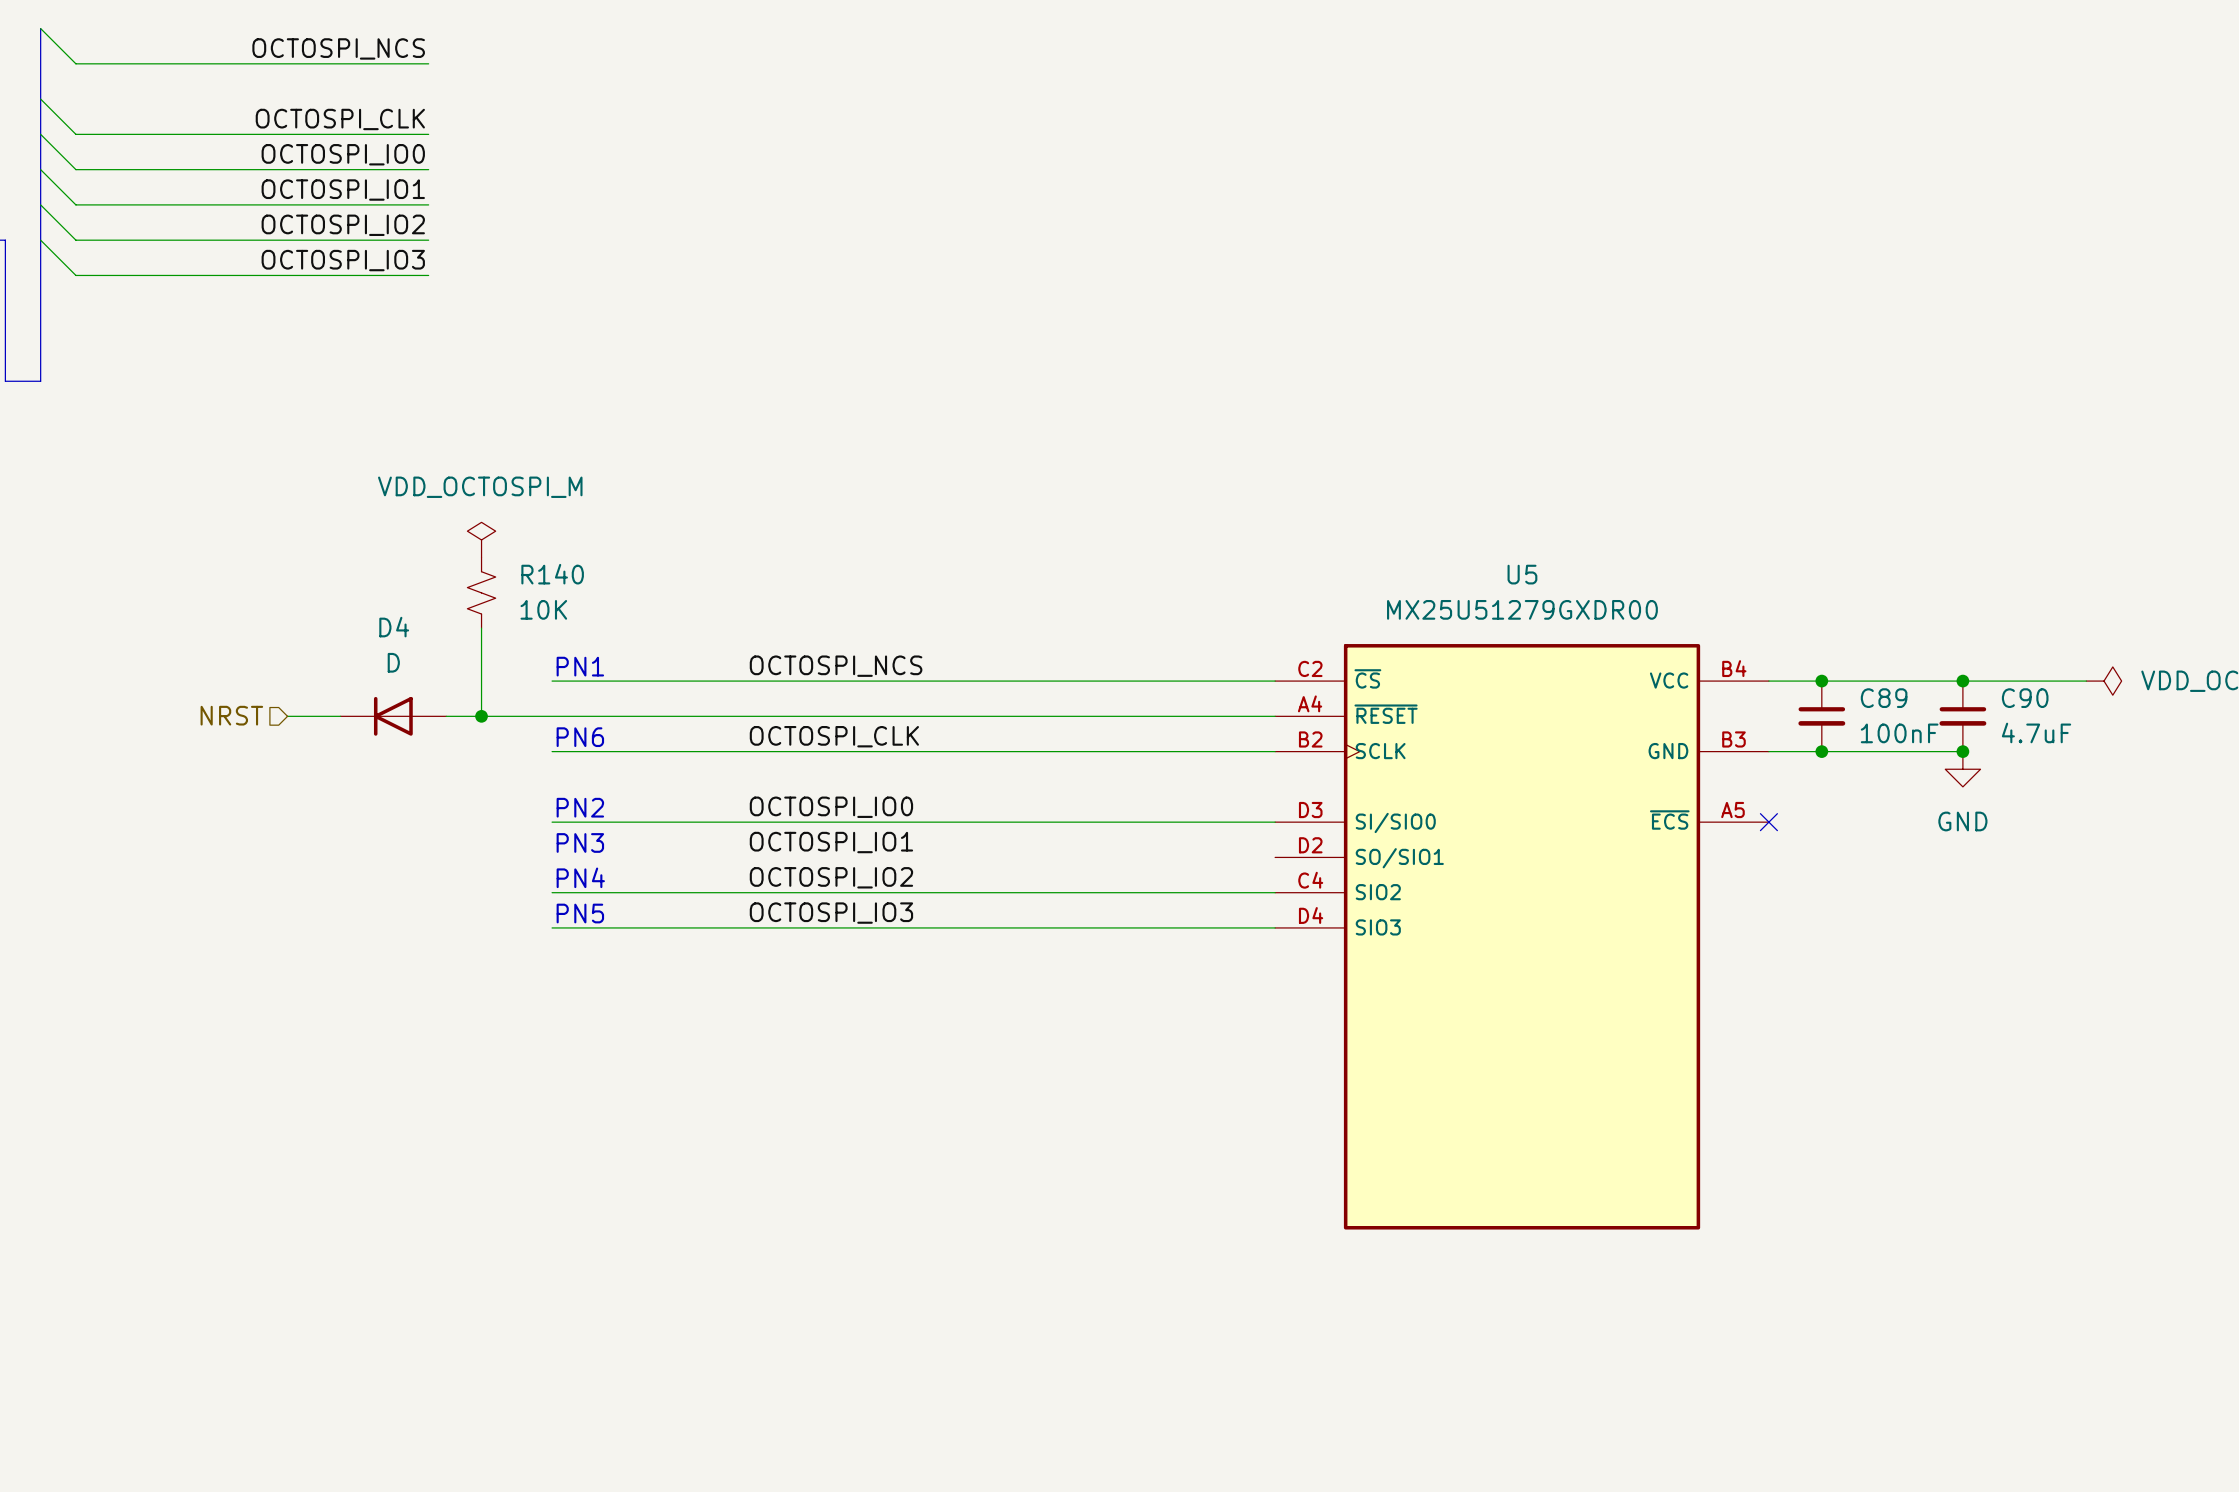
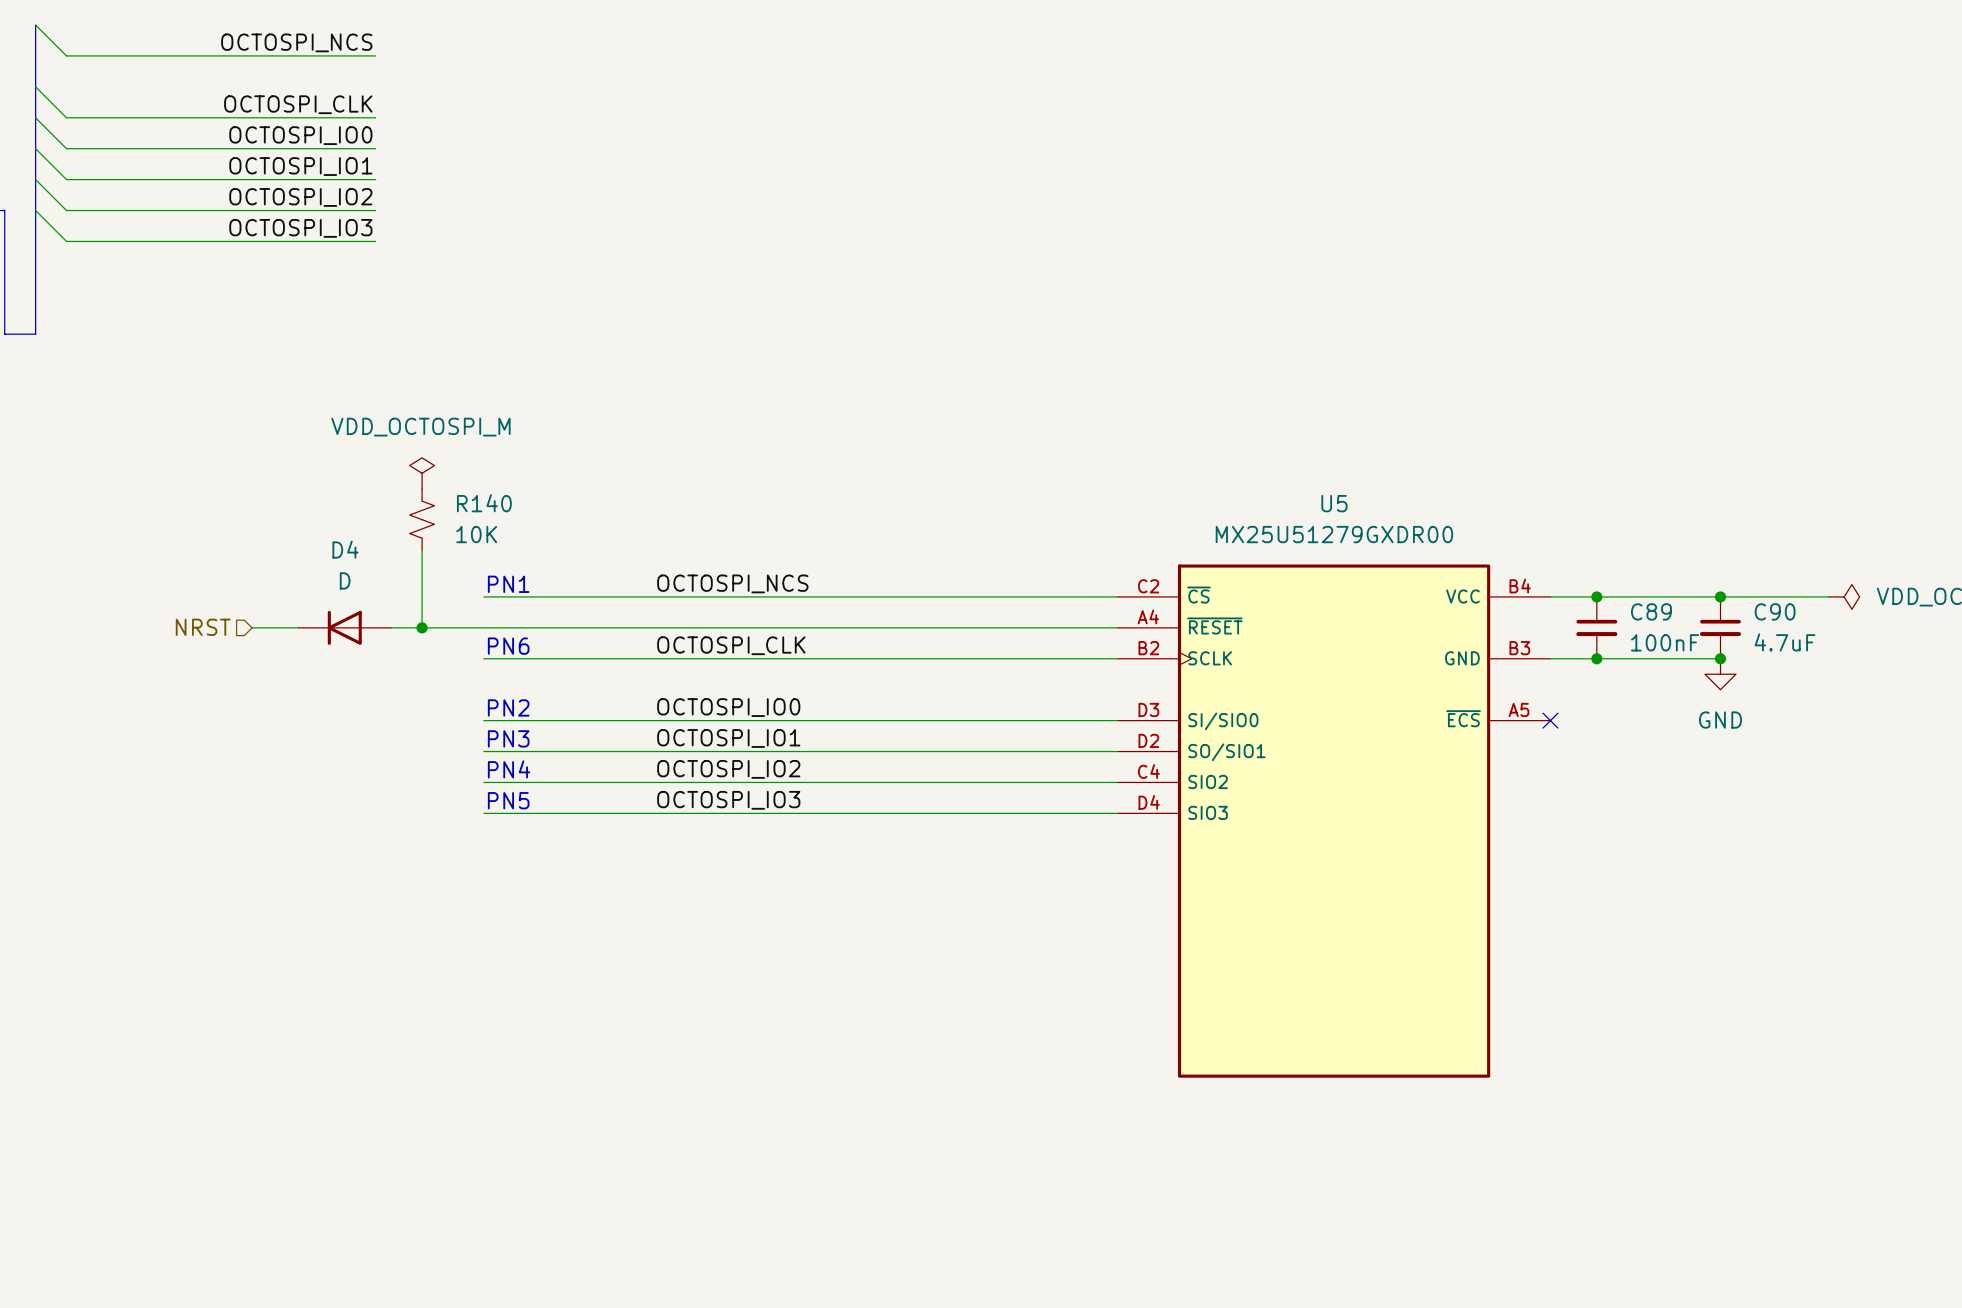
wire: none -> (483, 751) (1117, 751)

